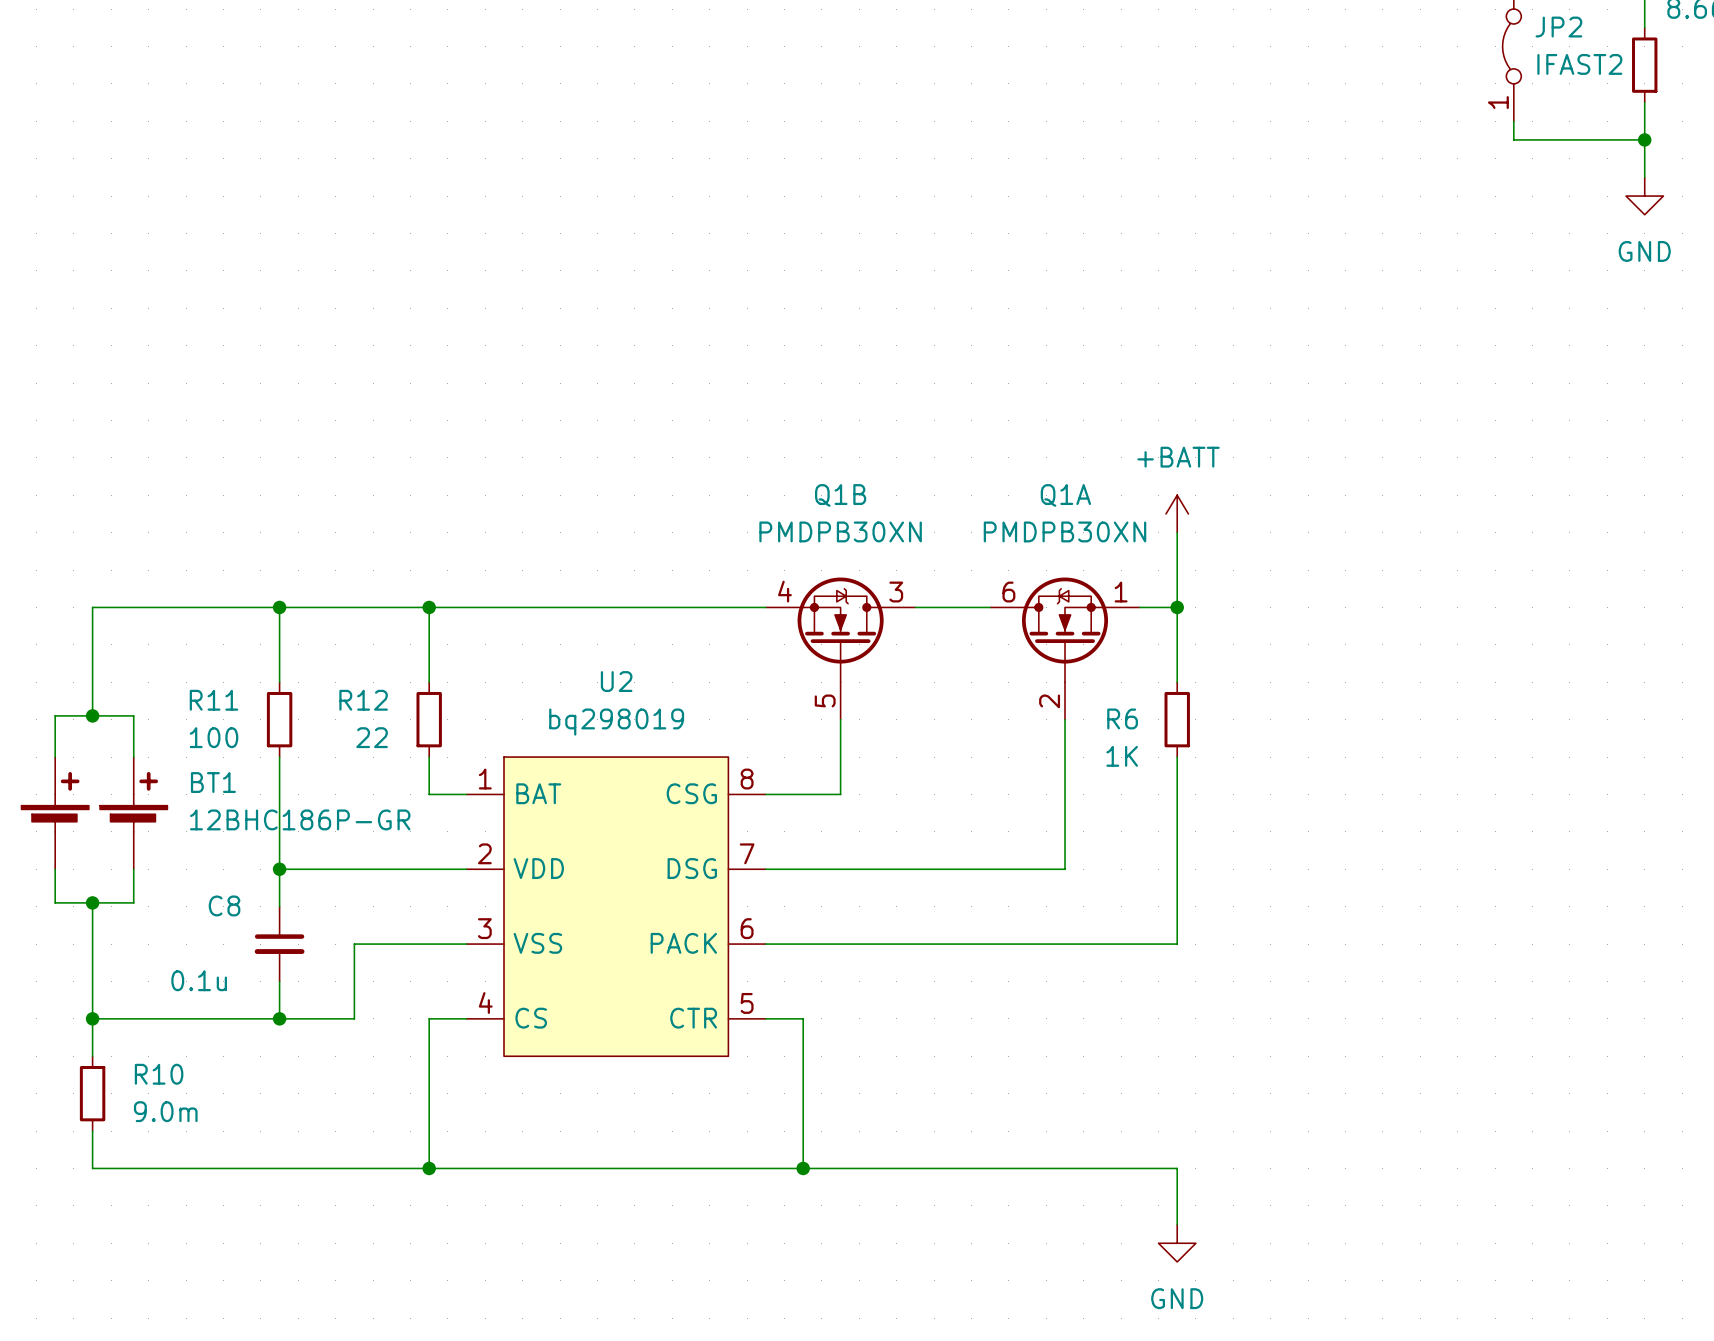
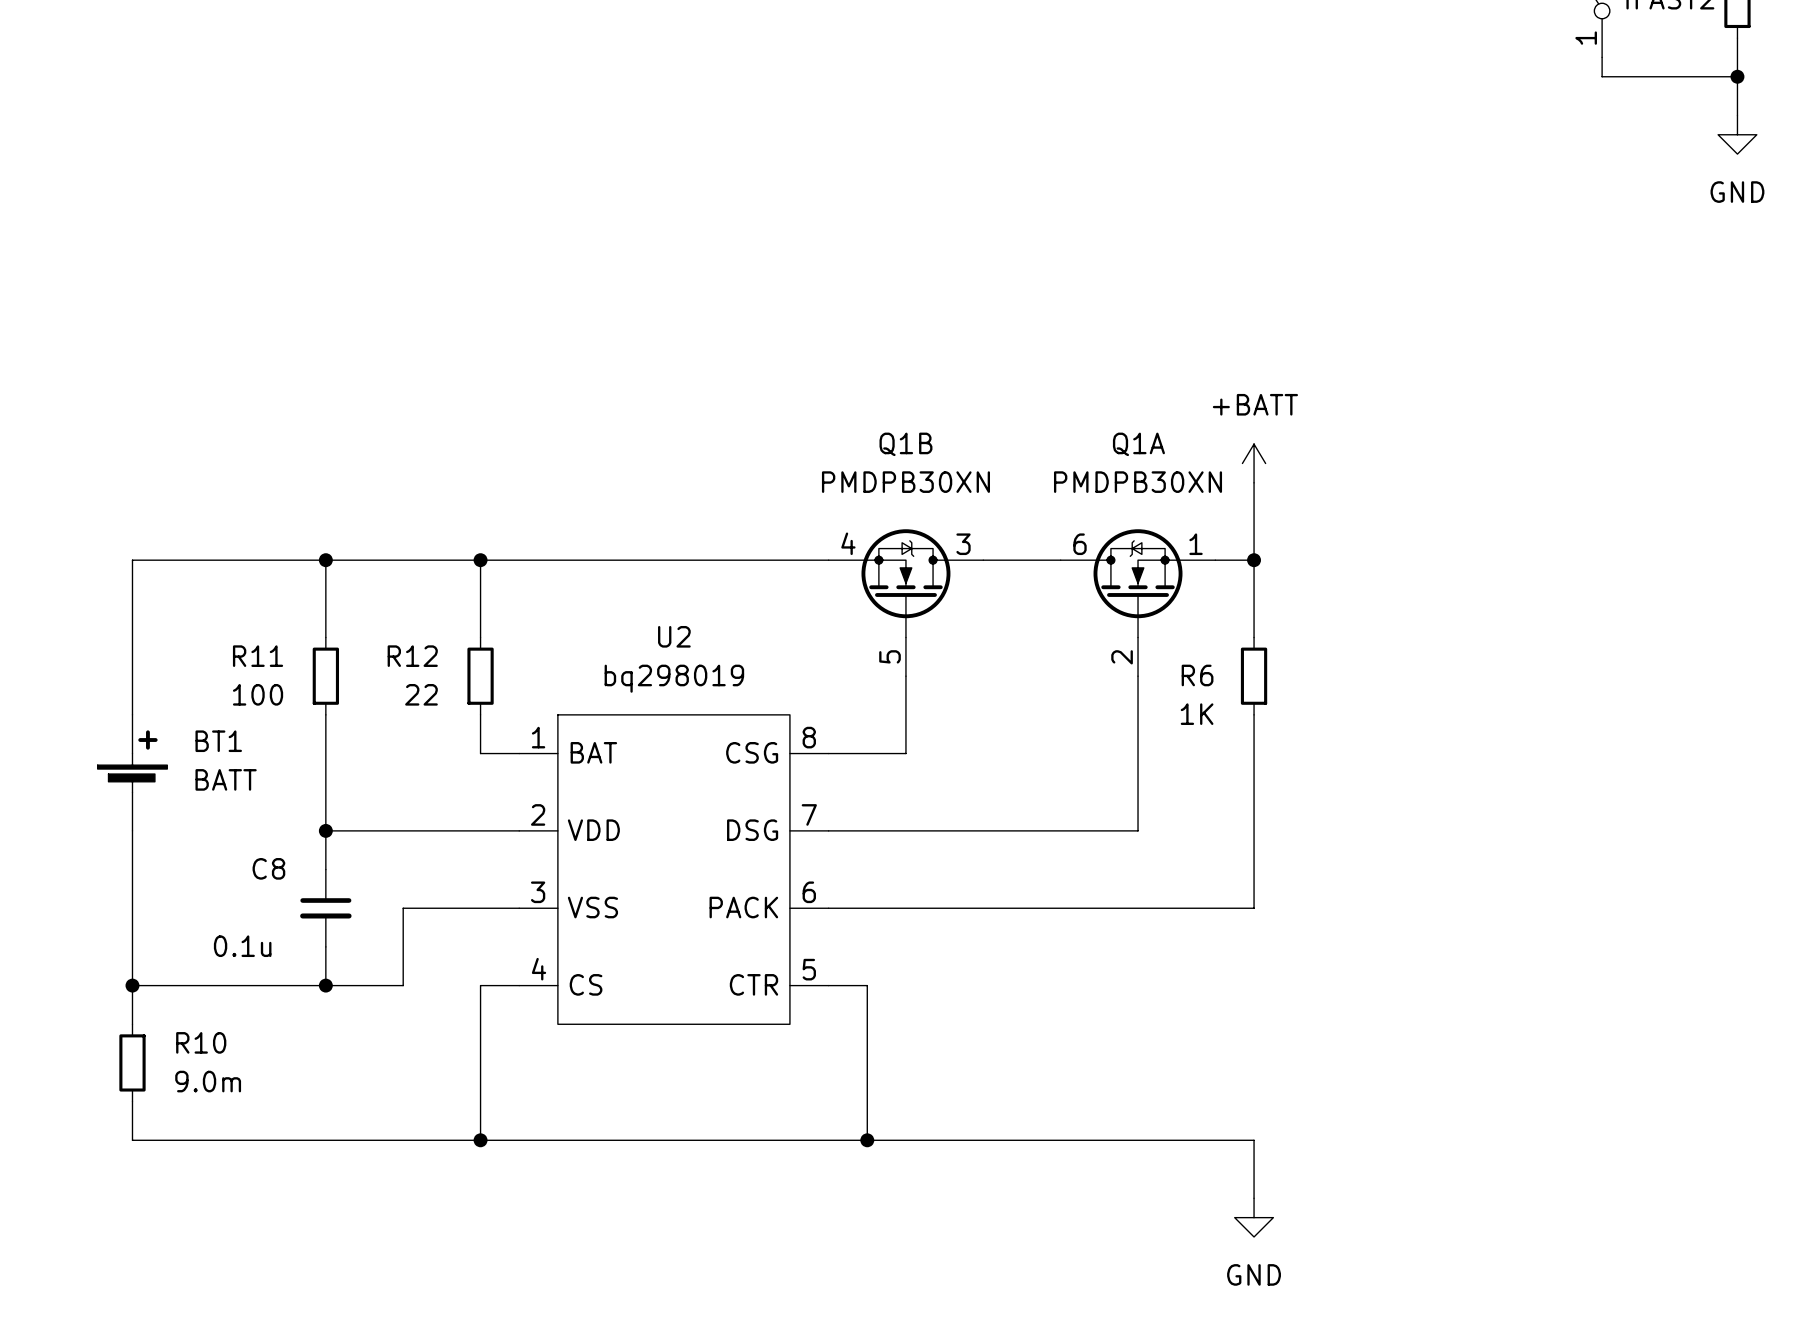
wire: none -> (132, 672) (132, 714)
junction: (92, 715) -> none
BT1 symbol: [21, 757, 168, 870] -> [97, 714, 168, 831]
wire: (55, 757) (55, 715) (133, 715) (133, 757) -> none
BT1 name position: BT1 (213, 782) -> BT1 (218, 741)
BT1 value: 12BHC186P-GR (300, 819) -> BATT (226, 779)
wire: (55, 869) (55, 902) (133, 902) (133, 869) -> none
wire: none -> (132, 830) (132, 865)
junction: (92, 902) -> none

